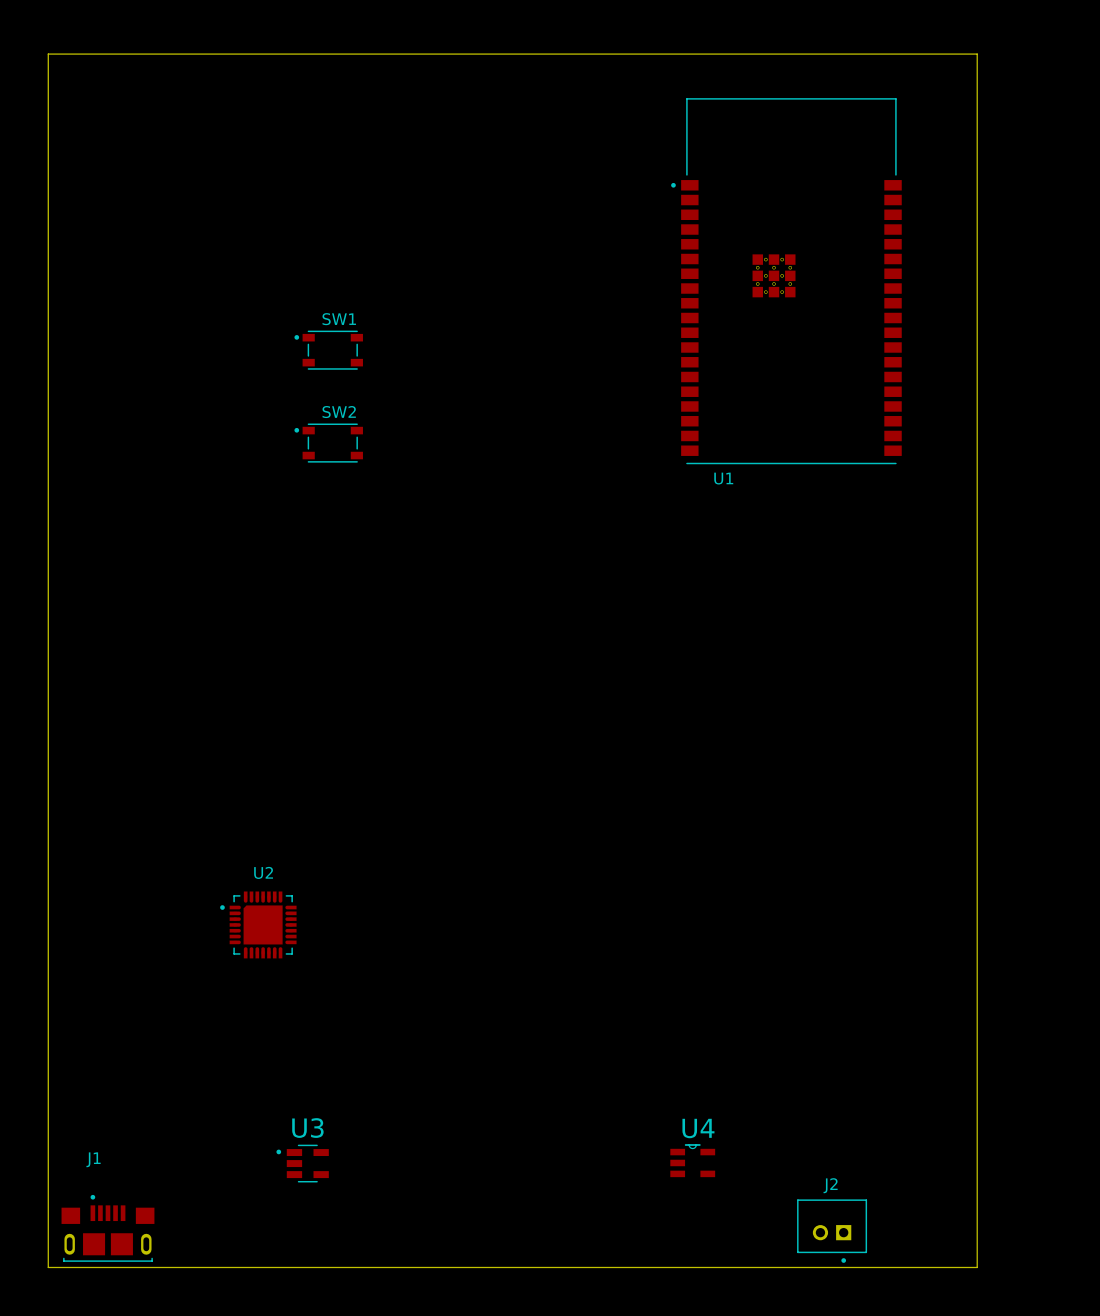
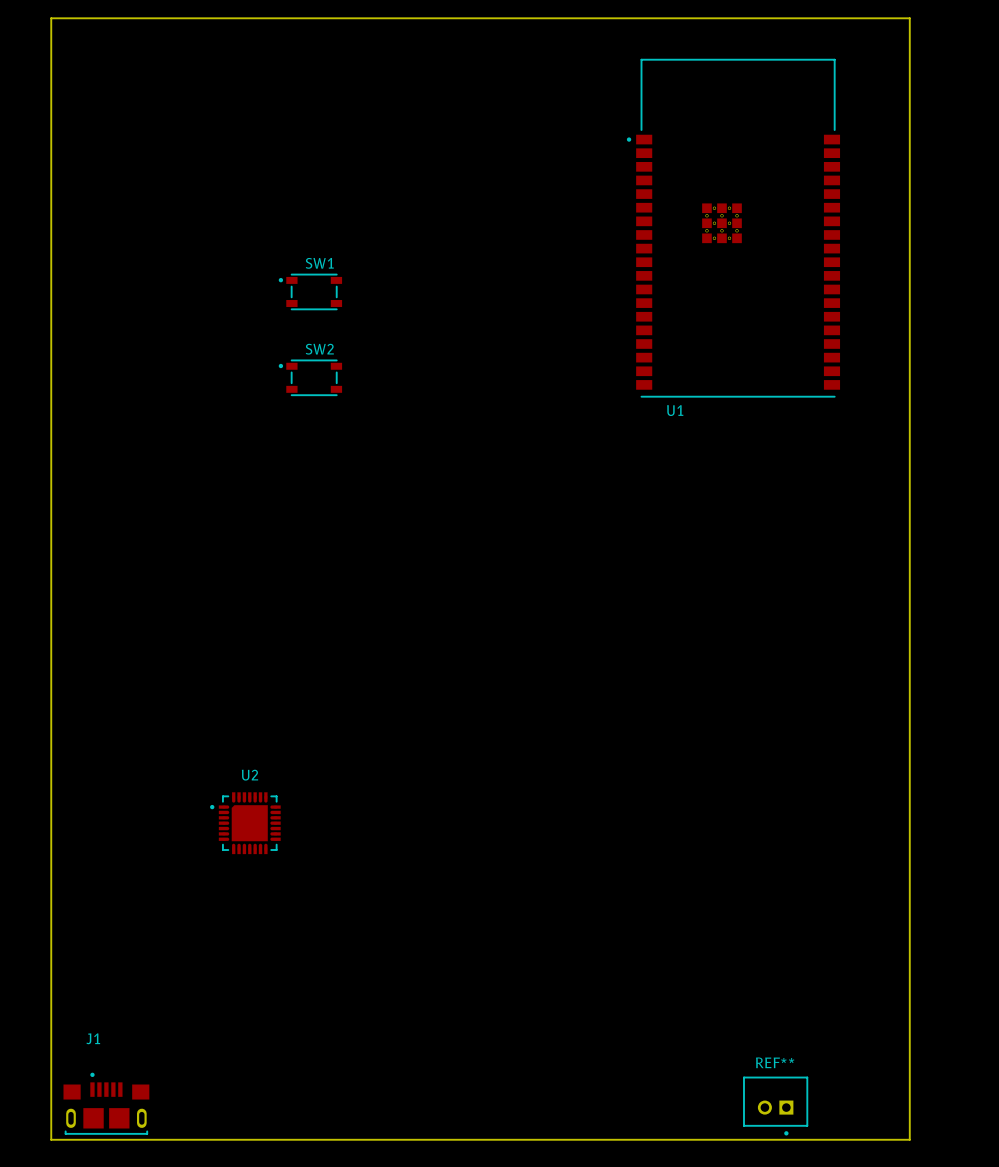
U4: (692, 1160) -> none
U3: (302, 1163) -> none
J2 name: J2 (830, 1185) -> REF** (775, 1062)

